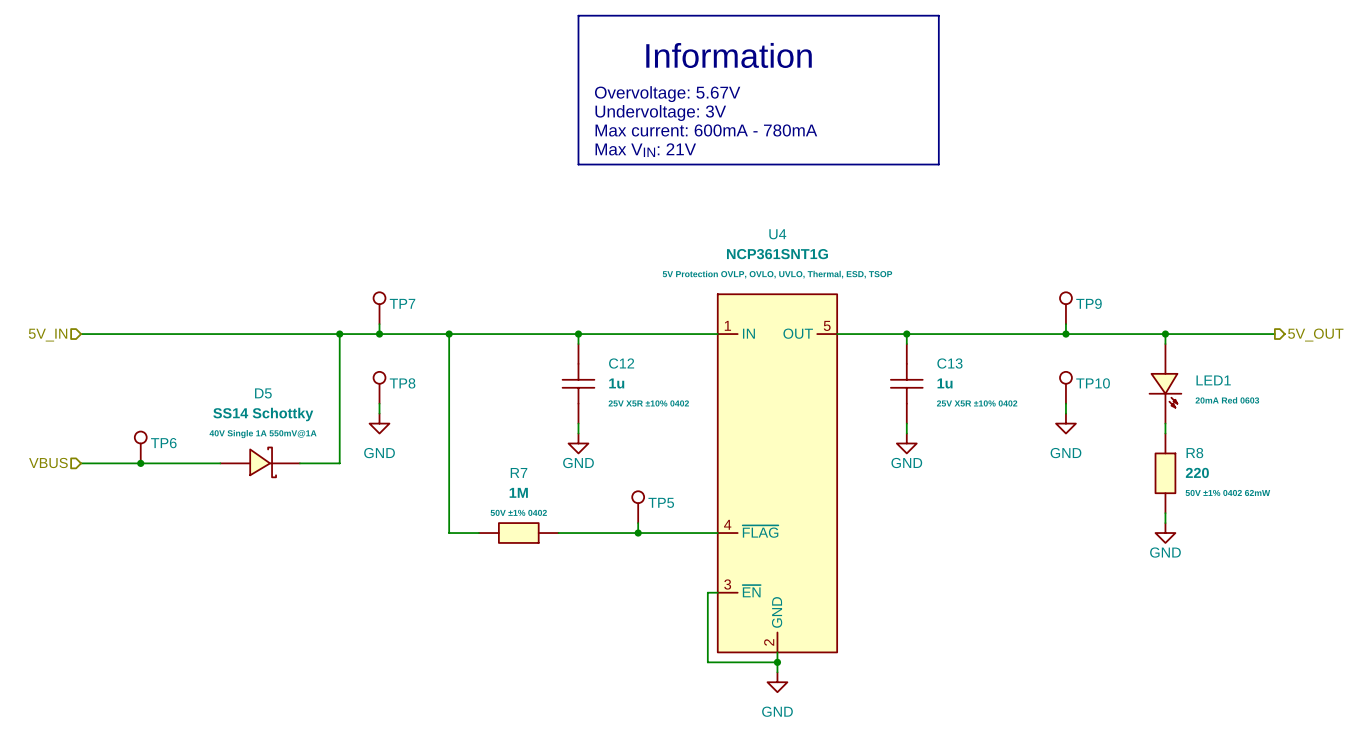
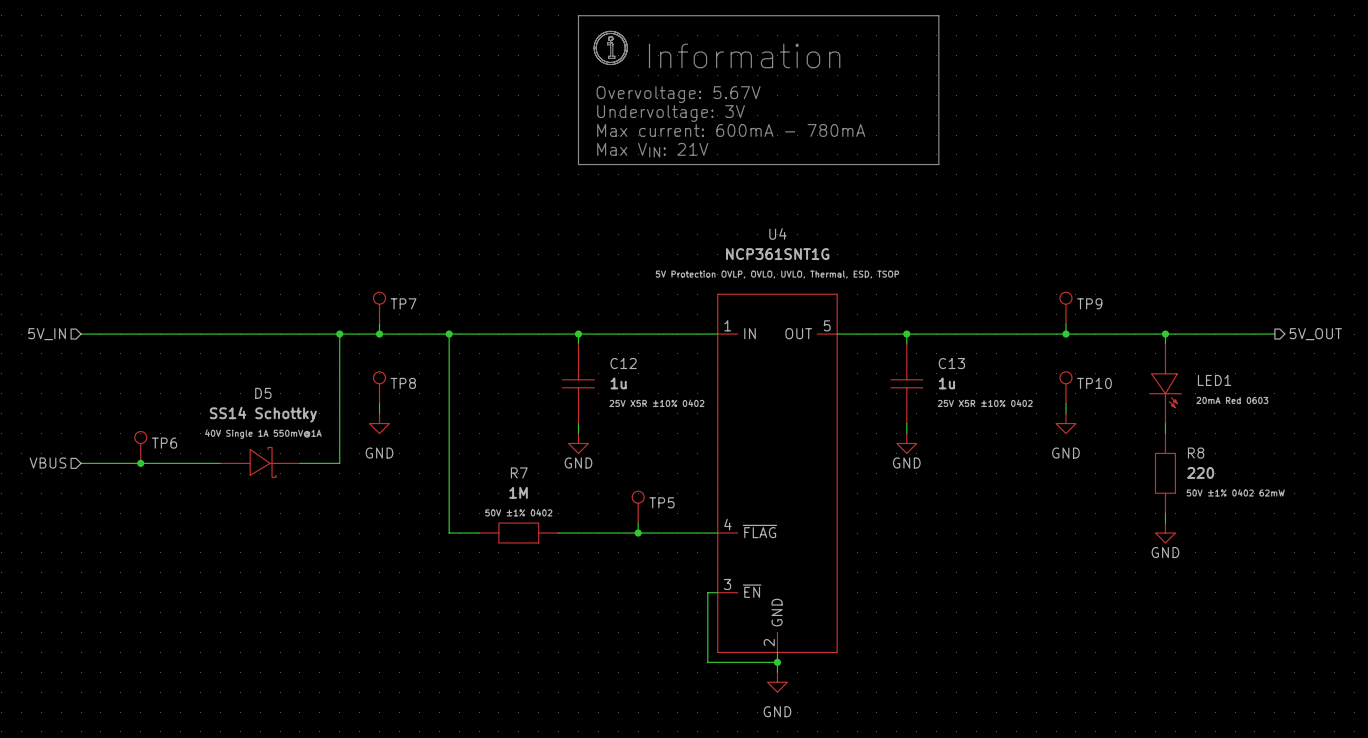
line: none -> (610, 31) (598, 36) (594, 47) (599, 59) (611, 64) (622, 59) (627, 47) (622, 36) (610, 31)
line: none -> (610, 42) (607, 42) (607, 44) (610, 44) (610, 56) (608, 58) (614, 58) (612, 56) (612, 44)
line: none -> (596, 48) (601, 58) (611, 62) (621, 57) (625, 47) (620, 37) (609, 33) (600, 37) (596, 48)

